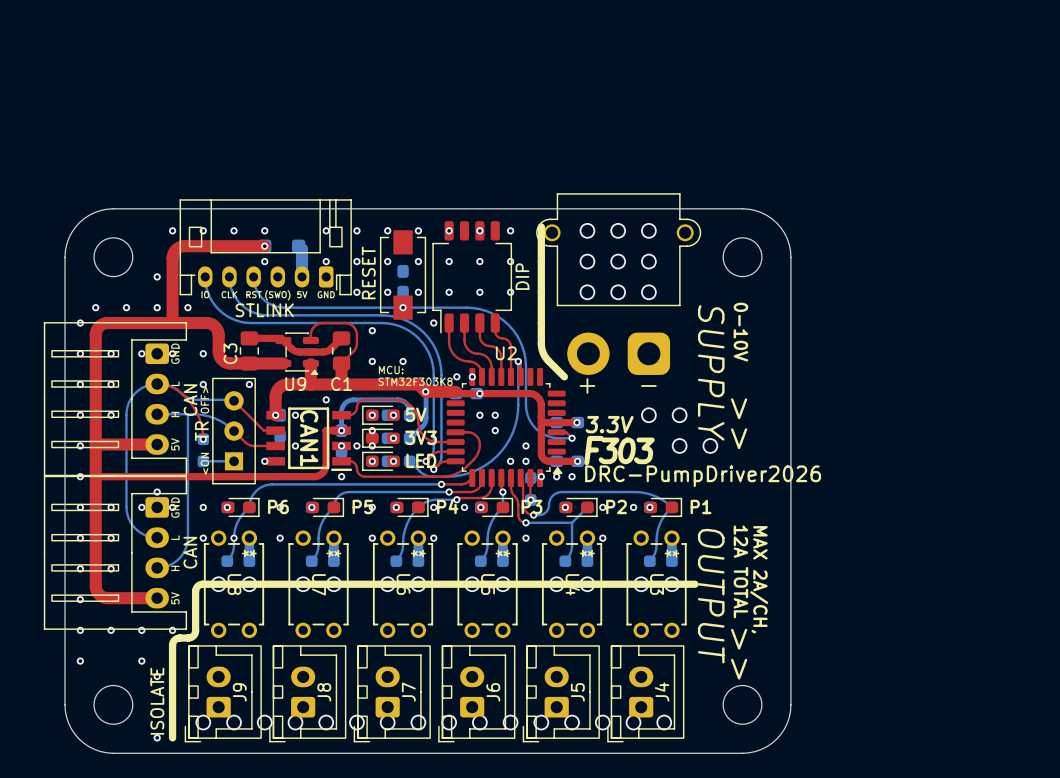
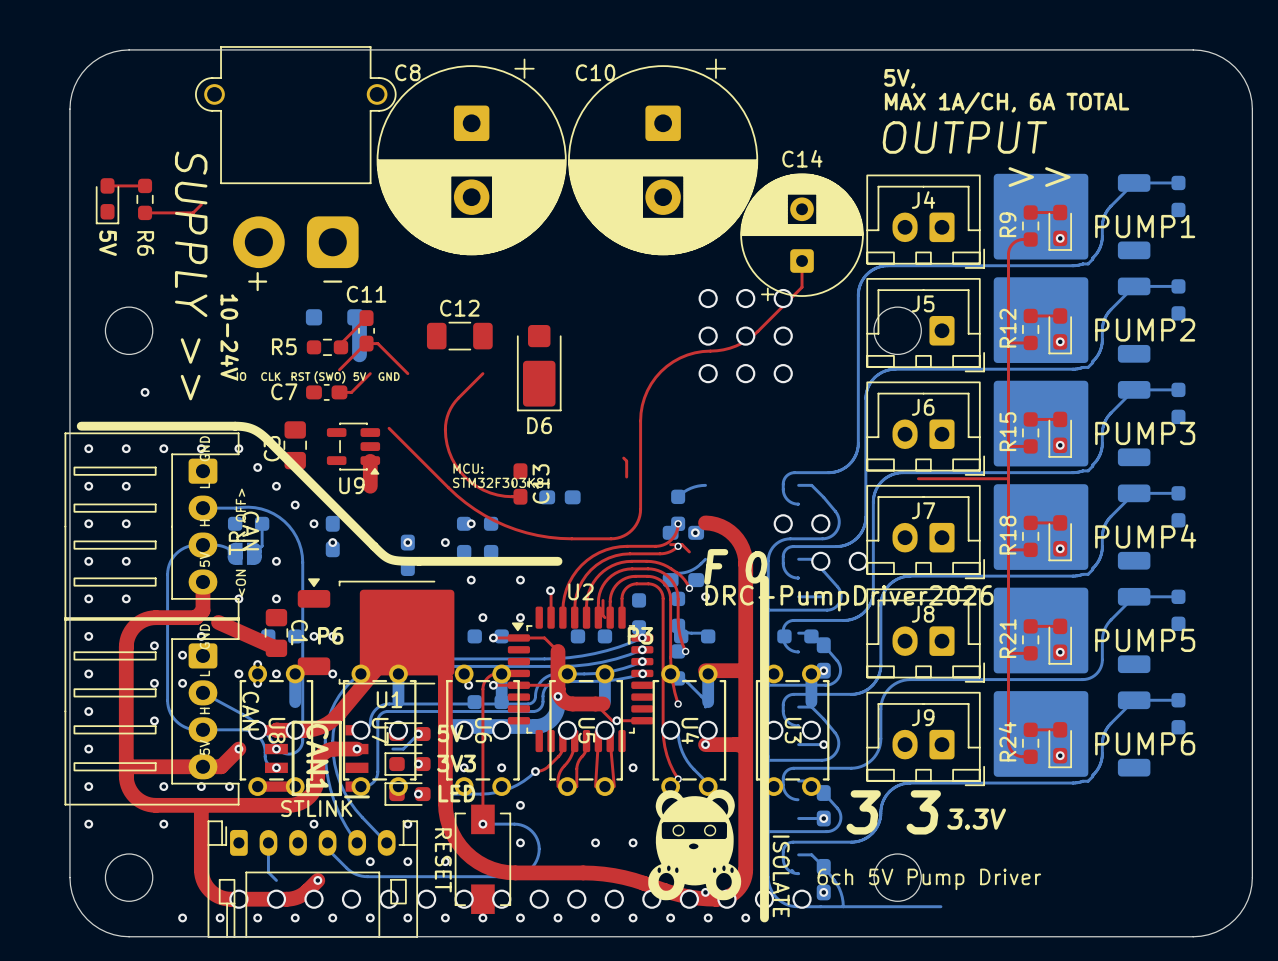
text: none -> 5V, (899, 78)
text: none -> MAX 1A/CH, 6A TOTAL (1007, 103)
text: none -> OUTPUT (964, 137)
C8: none -> (471, 156)
C10: none -> (663, 156)
part: none -> (295, 157)
text: none -> >> (1039, 177)
bottom track: none -> (1178, 182) (1134, 182) (1105, 213) (1102, 222) (1100, 246) (1088, 263) (1073, 265) (886, 265) (877, 267) (868, 273) (861, 281) (858, 294) (857, 451) (849, 464) (838, 470) (793, 472) (786, 476) (783, 482) (784, 495) (790, 501) (798, 504)
top track: none -> (107, 185) (145, 185)
part: none -> (1178, 196)
R6: none -> (145, 199)
part: none -> 5V (107, 201)
top track: none -> (201, 204) (193, 212) (145, 212)
top track: none -> (1030, 212) (1060, 212)
part: none -> (1072, 216)
R9: none -> (1030, 226)
text: none -> PUMP1 (1145, 226)
part: none -> (1060, 227)
text: none -> SUPPLY (191, 234)
C14: none -> (802, 237)
via: none -> (1060, 238)
top track: none -> (1030, 239) (1015, 241) (1010, 246) (1008, 254) (1008, 742) (1010, 749) (1015, 754) (1030, 756)
top track: none -> (802, 261) (802, 287) (752, 335) (729, 348) (694, 352) (680, 358) (661, 371) (651, 383) (644, 397) (641, 413) (639, 515) (631, 530) (620, 537) (611, 538) (549, 537) (515, 529) (494, 520) (456, 495) (389, 428)
bottom track: none -> (1178, 286) (1134, 286) (1105, 316) (1102, 325) (1100, 349) (1088, 367) (1073, 369) (894, 369) (877, 375) (869, 385) (865, 395) (865, 517) (864, 527) (857, 537) (844, 545) (793, 546) (787, 548) (783, 555) (784, 568) (790, 575) (798, 578)
line: (541, 227) (541, 346) (546, 358) (564, 376) -> none
via: (172, 230) -> none
via: (203, 230) -> none
via: (234, 230) -> none
via: (264, 230) -> none
via: (326, 230) -> none
via: (356, 230) -> none
via: (387, 230) -> none
via: (418, 230) -> none
via: (449, 230) -> none
via: (479, 230) -> none
via: (510, 230) -> none
part: none -> (1178, 299)
top track: none -> (1030, 315) (1060, 315)
top track: (264, 246) (184, 246) (177, 248) (172, 256) (172, 323) -> none
via: (264, 246) -> none
top track: none -> (366, 318) (340, 343) (340, 347)
part: STLINK (265, 247) -> none
part: none -> (1072, 320)
R12: none -> (1030, 329)
text: none -> PUMP2 (1145, 329)
board edge: (65, 257) (68, 238) (79, 222) (94, 212) (113, 208) (742, 208) (761, 212) (772, 218) (780, 227) (787, 238) (790, 257) (790, 704) (787, 723) (776, 739) (761, 749) (742, 753) -> (69, 330) (70, 101) (74, 86) (87, 67) (99, 57) (113, 51) (129, 49) (1193, 49) (1208, 51) (1229, 62) (1240, 73) (1247, 86) (1252, 109) (1252, 877) (1247, 900) (1240, 913) (1229, 924) (1215, 932) (1200, 936) (897, 936)
C11: none -> (366, 330)
part: none -> (1060, 331)
via: (264, 261) -> none
via: (326, 261) -> none
via: (356, 261) -> none
C12: none -> (459, 336)
via: (387, 261) -> none
via: (418, 261) -> none
via: (449, 261) -> none
via: (479, 261) -> none
via: (510, 261) -> none
text: none -> 10-24V (229, 337)
via: none -> (1060, 341)
top track: none -> (1008, 342) (1030, 342)
R5: none -> (327, 347)
text: RESET (368, 273) -> none
part: (403, 275) -> none
via: (157, 276) -> none
bottom track: (205, 276) (207, 292) (215, 305) (226, 315) (241, 321) (387, 323) (404, 328) (414, 334) (428, 352) (433, 369) (433, 449) (426, 461) -> none
bottom track: (229, 276) (232, 291) (237, 300) (244, 307) (257, 314) (388, 315) (407, 321) (424, 332) (435, 349) (441, 368) (441, 457) (433, 469) -> none
bottom track: (253, 276) (255, 287) (260, 296) (271, 304) (280, 307) (466, 307) (492, 313) (513, 329) (522, 347) (525, 360) (526, 409) (530, 421) (539, 431) (546, 435) (572, 438) -> none
part: DIP (472, 277) -> none
part: (403, 281) -> none
part: (618, 284) -> none
D6: none -> (539, 368)
text: none -> >> (190, 369)
top track: none -> (339, 369) (365, 343) (377, 343) (407, 373)
top track: none -> (370, 373) (351, 392) (339, 392)
via: (356, 292) -> none
via: (387, 292) -> none
top track: none -> (482, 373) (455, 401) (448, 412) (445, 429) (449, 451) (460, 471) (476, 486) (497, 495) (520, 496)
via: (418, 292) -> none
via: (449, 292) -> none
via: (479, 292) -> none
via: (510, 292) -> none
bottom track: none -> (1178, 389) (1134, 389) (1105, 419) (1102, 429) (1100, 453) (1088, 470) (1073, 472) (901, 472) (886, 477) (877, 487) (873, 497) (873, 591) (870, 604) (861, 614) (850, 619) (788, 622) (783, 628) (784, 642) (790, 649) (798, 651)
via: (95, 307) -> none
via: (157, 307) -> none
via: (187, 307) -> none
C7: none -> (326, 392)
via: (403, 307) -> none
part: none -> (1178, 403)
via: (80, 323) -> none
via: (433, 323) -> none
top track: (449, 323) (449, 343) (452, 352) (460, 359) (477, 364) (481, 370) (481, 376) -> none
top track: (464, 323) (465, 346) (470, 351) (482, 354) (488, 358) (491, 365) (491, 376) -> none
top track: (479, 323) (481, 342) (495, 347) (500, 353) (501, 376) -> none
top track: (495, 323) (496, 335) (506, 339) (510, 344) (511, 376) -> none
top track: none -> (1030, 419) (1060, 419)
via: (372, 330) -> none
text: 0-10V (740, 332) -> none
part: none -> (1072, 423)
line: none -> (81, 426) (235, 426) (249, 427) (266, 439) (376, 548) (388, 558) (409, 561) (558, 561)
top track: (249, 338) (281, 338) (293, 349) (299, 352) (326, 351) (341, 338) -> none
top track: (310, 340) (312, 329) (320, 323) (346, 323) (355, 328) (356, 345) (341, 363) (341, 384) -> none
R15: none -> (1030, 432)
text: none -> PUMP3 (1145, 433)
part: none -> (1060, 434)
C1 position: (341, 350) -> (276, 632)
via: none -> (1060, 445)
top track: none -> (1008, 446) (1030, 446)
via: (372, 361) -> none
via: (403, 361) -> none
bottom track: (518, 361) (516, 419) (509, 438) (497, 455) (474, 471) (453, 476) (427, 475) (409, 461) -> none
via: (518, 361) -> none
top track: (283, 363) (225, 362) (218, 354) (217, 329) (209, 323) (106, 323) (96, 329) (96, 588) (99, 594) (106, 598) (157, 598) -> none
via: none -> (257, 467)
text: SUPPLY (711, 372) -> none
via: (456, 376) -> none
via: (472, 376) -> none
top track: none -> (918, 478) (1008, 478)
C13: none -> (520, 483)
bottom track: none -> (705, 485) (690, 488) (678, 496)
bottom track: none -> (798, 485) (811, 485) (836, 513) (839, 523) (835, 532) (826, 538) (787, 539) (779, 541) (772, 547) (768, 558) (768, 877) (769, 886) (779, 900) (794, 906) (940, 906)
top track: (157, 384) (174, 388) (190, 402) (200, 422) (203, 439) -> none
via: (203, 384) -> none
via: none -> (276, 486)
via: (249, 384) -> none
C1 name rotation: 0° (341, 384) -> 90° clockwise (299, 632)
C1 name position: C1 (341, 384) -> C1 (299, 632)
bottom track: none -> (1178, 493) (1134, 493) (1105, 523) (1102, 532) (1100, 556) (1088, 574) (1073, 576) (909, 576) (895, 580) (887, 587) (881, 599) (880, 667) (875, 681) (866, 690) (855, 694) (788, 695) (783, 702) (784, 715) (790, 723) (798, 725)
bottom track: (425, 391) (425, 421) (409, 438) -> none
via: (425, 391) -> none
top track: (455, 391) (425, 391) (418, 384) (286, 384) (280, 387) (276, 392) (275, 415) -> none
top track: (455, 393) (529, 393) (535, 395) (541, 404) (542, 457) (548, 461) (577, 461) -> none
via: (479, 393) -> none
part position: (115, 399) -> (152, 526)
via: none -> (295, 505)
via: (326, 399) -> none
part value rotation: 0° (190, 400) -> 180° (250, 530)
top track: (234, 400) (263, 430) (275, 430) -> none
bottom track: (234, 400) (193, 399) (171, 386) (159, 384) (141, 388) (130, 399) (126, 414) (126, 510) (128, 518) (135, 528) (145, 535) (157, 537) -> none
part: none -> (1178, 506)
bottom track: none -> (202, 508) (248, 507) (267, 511) (279, 517) (289, 526) (299, 543) (302, 562) (302, 740) (300, 747) (292, 753) (282, 752) (276, 749) (262, 729) (249, 718) (202, 692)
part: none -> (678, 510)
bottom track: (157, 414) (204, 415) (220, 421) (234, 431) -> none
bottom track: (187, 414) (187, 544) (183, 553) (176, 561) (167, 566) (157, 567) -> none
top track: none -> (705, 522) (720, 526) (733, 535) (742, 548) (745, 564) (745, 869) (741, 885) (728, 896) (716, 899) (689, 896) (633, 880) (603, 874) (507, 872) (492, 869) (471, 857) (460, 846) (452, 833) (445, 810) (444, 671) (439, 660) (411, 632) (407, 632) (331, 720) (318, 727) (309, 730) (276, 729)
top track: none -> (1030, 522) (1060, 522)
part: none -> (248, 523)
bottom track: none -> (262, 523) (262, 546) (254, 553)
via: none -> (313, 523)
via: (275, 415) -> none
via: (295, 415) -> none
top track: (341, 415) (353, 413) (358, 403) (362, 400) (401, 400) (409, 404) (415, 411) (419, 429) (425, 437) (435, 441) (455, 441) -> none
via: (372, 415) -> none
part position: (380, 415) -> (407, 734)
bottom track: (409, 415) (407, 405) (400, 400) (350, 400) (342, 407) (341, 430) -> none
via: (479, 415) -> none
via: (495, 415) -> none
top track: none -> (678, 523) (673, 537) (663, 545) (612, 547) (599, 552) (587, 560) (576, 570) (569, 582) (564, 596) (562, 617)
via: none -> (678, 523)
part: none -> (1072, 527)
top track: (541, 422) (576, 422) -> none
text: >> (739, 423) -> none
text: 3.3V (609, 424) -> none
R18: none -> (1030, 536)
text: none -> PUMP4 (1145, 536)
U2 rotation: 0° (506, 427) -> 180° (580, 679)
U2 position: (506, 427) -> (580, 679)
part: none -> (1060, 538)
via: none -> (332, 542)
top track: (341, 430) (326, 430) (325, 467) (322, 473) (315, 476) (95, 476) -> none
via: (495, 430) -> none
top track: (234, 431) (250, 445) (275, 445) -> none
part: (234, 431) -> none
top track: (455, 432) (474, 434) (478, 439) (479, 446) (473, 459) (461, 470) (452, 475) (364, 476) (358, 473) (354, 462) (341, 461) -> none
part footprint: [197, 433, 210, 468] -> [227, 542, 262, 565]
top track: none -> (678, 546) (665, 553) (615, 555) (596, 565) (586, 575) (578, 587) (575, 601) (574, 617)
via: none -> (678, 546)
via: none -> (1060, 548)
top track: none -> (1008, 549) (1030, 549)
part position: (380, 438) -> (407, 764)
via: (393, 438) -> none
via: (572, 438) -> none
bottom track: none -> (235, 553) (219, 545) (193, 545) (181, 549) (170, 561) (167, 574) (168, 706) (174, 718) (187, 728) (245, 729) (254, 733) (262, 742) (266, 762) (276, 767)
via: (203, 439) -> none
CAN1 position: (309, 439) -> (317, 759)
top track: (95, 444) (157, 444) -> none
bottom track: none -> (705, 559) (693, 569) (678, 573)
bottom track: none -> (798, 559) (811, 559) (823, 571) (839, 589) (841, 596) (839, 603) (828, 610) (768, 610)
via: none -> (126, 561)
via: none -> (276, 561)
via: (295, 445) -> none
via: (341, 445) -> none
via: (356, 445) -> none
via: (372, 445) -> none
via: (525, 445) -> none
text: 3 (609, 450) -> none
text: 3 (644, 450) -> none
top track: (455, 451) (437, 452) (426, 461) -> none
bottom track: (203, 461) (234, 461) -> none
via: (264, 461) -> none
via: (372, 461) -> none
part position: (380, 461) -> (407, 794)
part: (398, 461) -> none
via: (426, 461) -> none
via: none -> (520, 580)
top track: (455, 461) (442, 462) (433, 469) -> none
via: (510, 461) -> none
via: (525, 461) -> none
via: (577, 461) -> none
line: none -> (764, 580) (764, 917)
top track: none -> (201, 583) (202, 582) (202, 610) (195, 617) (146, 619) (134, 626) (127, 637) (126, 647) (126, 775) (127, 785) (134, 796) (146, 803) (155, 805) (296, 804) (306, 799) (313, 790) (317, 780) (318, 762) (322, 754) (332, 749) (357, 749)
top track: none -> (689, 588) (679, 574) (663, 564) (651, 561) (621, 562) (603, 571) (593, 582) (587, 596) (586, 617)
via: none -> (689, 588)
via: (433, 469) -> none
top track: none -> (550, 590) (551, 617)
via: none -> (550, 590)
via: none -> (705, 596)
bottom track: none -> (798, 596) (823, 596)
bottom track: none -> (1178, 596) (1134, 596) (1105, 626) (1102, 637) (1100, 667) (1094, 675) (1087, 678) (910, 679) (897, 682) (887, 690) (882, 699) (880, 742) (874, 757) (864, 765) (854, 768) (788, 769) (783, 776) (784, 789) (788, 796) (798, 799)
via: none -> (126, 598)
via: none -> (238, 598)
via: none -> (276, 598)
via: (341, 476) -> none
via: (541, 476) -> none
via: (556, 476) -> none
via: (572, 476) -> none
top track: (472, 477) (463, 484) (441, 484) -> none
top track: (481, 477) (480, 485) (475, 490) (449, 492) -> none
top track: (491, 477) (490, 489) (486, 496) (456, 499) -> none
top track: (511, 477) (511, 490) (518, 503) (518, 517) (521, 521) (525, 522) -> none
top track: (520, 477) (523, 482) (523, 508) (528, 513) (533, 515) -> none
top track: (530, 477) (530, 500) -> none
bottom track: (441, 484) (264, 485) (254, 493) (249, 507) (238, 519) (234, 533) (233, 551) (227, 561) -> none
via: (441, 484) -> none
part: none -> (1178, 610)
part: none -> (678, 612)
via: (157, 492) -> none
via: none -> (482, 617)
via: none -> (520, 617)
bottom track: (449, 492) (342, 493) (336, 499) (333, 507) (321, 523) (317, 551) (311, 561) -> none
via: (449, 492) -> none
top track: none -> (598, 617) (599, 593) (605, 582) (611, 575) (627, 569) (657, 570) (669, 577) (676, 588) (678, 627) (685, 651)
bottom track: (502, 492) (502, 507) (490, 524) (486, 550) (480, 561) -> none
via: (502, 492) -> none
top track: none -> (610, 617) (611, 595) (615, 586) (622, 579) (632, 576) (650, 576) (659, 579) (665, 585) (670, 596) (671, 669) (678, 703)
top track: none -> (622, 617) (622, 595) (627, 587) (635, 583) (650, 583) (659, 589) (663, 598) (663, 738) (666, 755) (678, 779)
top track: none -> (218, 622) (276, 648) (275, 647)
bottom track: none -> (678, 625) (687, 632) (705, 633)
bottom track: (456, 499) (431, 500) (417, 507) (406, 524) (402, 550) (396, 561) -> none
via: (456, 499) -> none
top track: none -> (1030, 626) (1060, 626)
via: (530, 500) -> none
part: none -> (1072, 630)
U1: none -> (376, 631)
bottom track: none -> (798, 633) (811, 633) (823, 645) (839, 663) (840, 670) (838, 678) (827, 685) (768, 685)
text: P5 (362, 506) -> none
text: P4 (447, 506) -> none
text: P2 (616, 506) -> none
text: P1 (701, 506) -> none
via: (111, 507) -> none
via: (141, 507) -> none
via: (203, 507) -> none
via: (227, 507) -> none
part: (240, 507) -> none
via: none -> (313, 636)
via: (311, 507) -> none
part: (325, 507) -> none
via: (372, 507) -> none
via: (396, 507) -> none
part: (409, 507) -> none
via: (433, 507) -> none
via: (464, 507) -> none
via: (480, 507) -> none
part: (494, 507) -> none
via: (565, 507) -> none
part: (578, 507) -> none
bottom track: (587, 507) (572, 522) -> none
via: (602, 507) -> none
via: (633, 507) -> none
via: (649, 507) -> none
part: (663, 507) -> none
top track: none -> (493, 637) (544, 637) (558, 651) (558, 690) (561, 698) (571, 703) (603, 703)
via: none -> (493, 637)
bottom track: none -> (642, 637) (606, 650) (569, 657) (400, 659) (376, 665) (362, 672) (349, 683) (335, 702) (328, 717) (325, 741) (326, 769) (333, 798) (341, 817) (357, 842)
via: none -> (642, 637)
R21: none -> (1030, 639)
text: none -> PUMP5 (1145, 640)
part: none -> (1060, 641)
via: none -> (154, 645)
bottom track: (533, 515) (545, 512) (551, 496) (560, 492) (634, 492) (654, 496) (671, 507) (659, 524) (655, 551) (649, 561) -> none
via: (533, 515) -> none
bottom track: none -> (642, 649) (615, 658) (574, 665) (399, 666) (375, 673) (360, 682) (344, 701) (336, 716) (332, 741) (334, 764) (340, 783) (349, 801) (386, 842)
via: none -> (642, 649)
via: none -> (685, 651)
top track: none -> (1008, 651) (1010, 653) (1030, 653)
via: none -> (1060, 652)
via: none -> (182, 655)
bottom track: (525, 522) (572, 522) -> none
via: (525, 522) -> none
bottom track: (572, 522) (571, 549) (565, 561) -> none
part: none -> (823, 657)
bottom track: none -> (642, 661) (604, 672) (549, 675) (540, 682) (534, 700) (529, 703) (384, 704) (374, 711) (368, 728) (357, 730)
via: none -> (642, 661)
via: none -> (257, 664)
top track: none -> (705, 670) (742, 670) (745, 673)
via: none -> (823, 670)
top track: none -> (518, 673) (494, 673) (487, 678) (483, 685) (482, 819)
via: (111, 538) -> none
via: (372, 538) -> none
via: (433, 538) -> none
via: (525, 538) -> none
bottom track: none -> (642, 673) (605, 680) (552, 682) (544, 689) (541, 706) (534, 711) (384, 712) (379, 715) (377, 720) (376, 776) (369, 785) (357, 786)
via: none -> (642, 673)
via: (602, 538) -> none
bottom track: none -> (678, 678) (686, 681) (701, 696) (705, 707)
via: none -> (154, 683)
via: none -> (182, 683)
via: none -> (257, 683)
via: none -> (468, 685)
top track: none -> (493, 685) (554, 685) (558, 688)
via: none -> (493, 685)
part position: (115, 552) -> (152, 711)
part value rotation: 0° (190, 552) -> 180° (250, 711)
text: * (245, 553) -> none
text: * (253, 553) -> none
text: * (329, 553) -> none
text: * (337, 553) -> none
text: * (414, 553) -> none
text: * (422, 553) -> none
text: * (499, 553) -> none
text: * (506, 553) -> none
text: * (583, 553) -> none
text: * (591, 553) -> none
text: * (668, 553) -> none
text: * (675, 553) -> none
bottom track: none -> (558, 696) (557, 707) (554, 715) (548, 722) (541, 725) (445, 726)
via: none -> (558, 696)
bottom track: none -> (1178, 700) (1134, 700) (1105, 730) (1102, 739) (1100, 763) (1088, 781) (1073, 783) (909, 783) (898, 785) (885, 795) (882, 804) (877, 826) (864, 838) (854, 842) (793, 842) (786, 844) (783, 850) (784, 863) (790, 871) (798, 873)
part: (238, 561) -> none
part: (322, 561) -> none
part: (491, 561) -> none
part rotation: 0° (576, 561) -> 90° clockwise (678, 664)
part position: (576, 561) -> (678, 664)
part: (660, 561) -> none
top track: none -> (595, 703) (612, 720) (642, 720)
via: none -> (678, 703)
bottom track: none -> (798, 707) (811, 707) (834, 732) (838, 742) (836, 752) (830, 758) (824, 760) (768, 760)
via: (111, 568) -> none
part: none -> (1178, 713)
text: 12A TOTAL (740, 571) -> none
via: none -> (154, 720)
via: none -> (616, 720)
text: MAX 2A/CH, (759, 579) -> none
top track: none -> (1030, 729) (1060, 729)
bottom track: none -> (678, 730) (680, 746) (684, 756) (705, 780)
line: (694, 584) (200, 584) (195, 590) (195, 633) (190, 637) (177, 638) (172, 644) (172, 737) -> none
bottom track: none -> (418, 734) (403, 749) (392, 749)
via: none -> (418, 734)
part: none -> (1072, 733)
top track: none -> (562, 741) (562, 748) (559, 755) (547, 767) (535, 771)
top track: none -> (574, 741) (572, 754) (559, 773) (558, 786)
top track: none -> (586, 741) (585, 751) (577, 766) (576, 786)
top track: none -> (598, 741) (595, 786)
top track: none -> (610, 741) (614, 786)
R24: none -> (1030, 743)
top track: none -> (705, 744) (736, 744) (745, 748)
via: none -> (705, 744)
bottom track: none -> (798, 744) (823, 744)
via: none -> (823, 744)
text: none -> PUMP6 (1145, 743)
text: OUTPUT (711, 596) -> none
part: none -> (1060, 745)
top track: none -> (238, 749) (221, 766) (126, 767)
via: none -> (238, 749)
via: none -> (276, 749)
via: none -> (357, 749)
via: none -> (1060, 755)
via: none -> (418, 764)
via: none -> (276, 767)
via: none -> (464, 767)
via: none -> (501, 767)
via: none -> (633, 767)
bottom track: none -> (535, 771) (517, 785) (496, 792) (445, 794)
via: none -> (535, 771)
via: none -> (678, 779)
bottom track: none -> (798, 780) (811, 780) (823, 793) (839, 811) (840, 818) (838, 824) (828, 831) (768, 831)
via: (111, 630) -> none
via: none -> (229, 786)
drawing: none -> [648, 789, 742, 901]
via: none -> (418, 794)
top track: none -> (201, 805) (201, 872) (205, 885) (215, 894) (227, 899) (289, 899) (303, 894) (317, 880)
via: none -> (520, 805)
part: none -> (823, 805)
text: none -> 3 (863, 812)
text: none -> 3 (923, 812)
text: >> (739, 654) -> none
bottom track: none -> (798, 818) (823, 818)
via: none -> (823, 818)
text: none -> 3.3V (976, 819)
via: none -> (313, 824)
via: none -> (407, 824)
bottom track: none -> (482, 824) (517, 824) (529, 829) (535, 836) (539, 845) (538, 855) (533, 866) (526, 872) (514, 876) (364, 876) (356, 874) (346, 868) (327, 848) (327, 842)
via: none -> (482, 824)
via: (157, 676) -> none
bottom track: none -> (268, 842) (268, 872) (276, 880)
via: none -> (520, 842)
via: none -> (595, 842)
via: none -> (633, 842)
bottom track: none -> (798, 854) (811, 854) (823, 866) (839, 888) (843, 906)
part: none -> (482, 859)
text: none -> RESET (443, 860)
via: none -> (370, 861)
via: none -> (407, 861)
via: none -> (445, 861)
J9 rotation: 0° (223, 693) -> 90° counterclockwise (925, 738)
J9 position: (223, 693) -> (925, 738)
J8 rotation: 0° (307, 693) -> 90° counterclockwise (925, 635)
J8 position: (307, 693) -> (925, 635)
J7 rotation: 0° (392, 693) -> 90° counterclockwise (925, 532)
J7 position: (392, 693) -> (925, 532)
J6 rotation: 0° (476, 693) -> 90° counterclockwise (925, 428)
J6 position: (476, 693) -> (925, 428)
J5 rotation: 0° (561, 693) -> 90° counterclockwise (925, 325)
J5 position: (561, 693) -> (925, 325)
J4 rotation: 0° (645, 693) -> 90° counterclockwise (925, 221)
J4 position: (645, 693) -> (925, 221)
bottom track: none -> (791, 870) (793, 871)
text: ISOLATE (157, 701) -> none
text: none -> ISOLATE (781, 876)
part: none -> STLINK (312, 879)
part: none -> (823, 879)
text: none -> 6ch 5V Pump Driver (929, 879)
via: none -> (317, 880)
via: none -> (705, 892)
via: none -> (823, 892)
via: none -> (220, 917)
via: none -> (257, 917)
via: none -> (295, 917)
via: none -> (332, 917)
via: none -> (370, 917)
via: none -> (407, 917)
via: none -> (445, 917)
via: none -> (482, 917)
via: none -> (520, 917)
via: none -> (558, 917)
via: none -> (595, 917)
via: none -> (633, 917)
via: none -> (670, 917)
via: none -> (708, 917)
via: none -> (745, 917)

